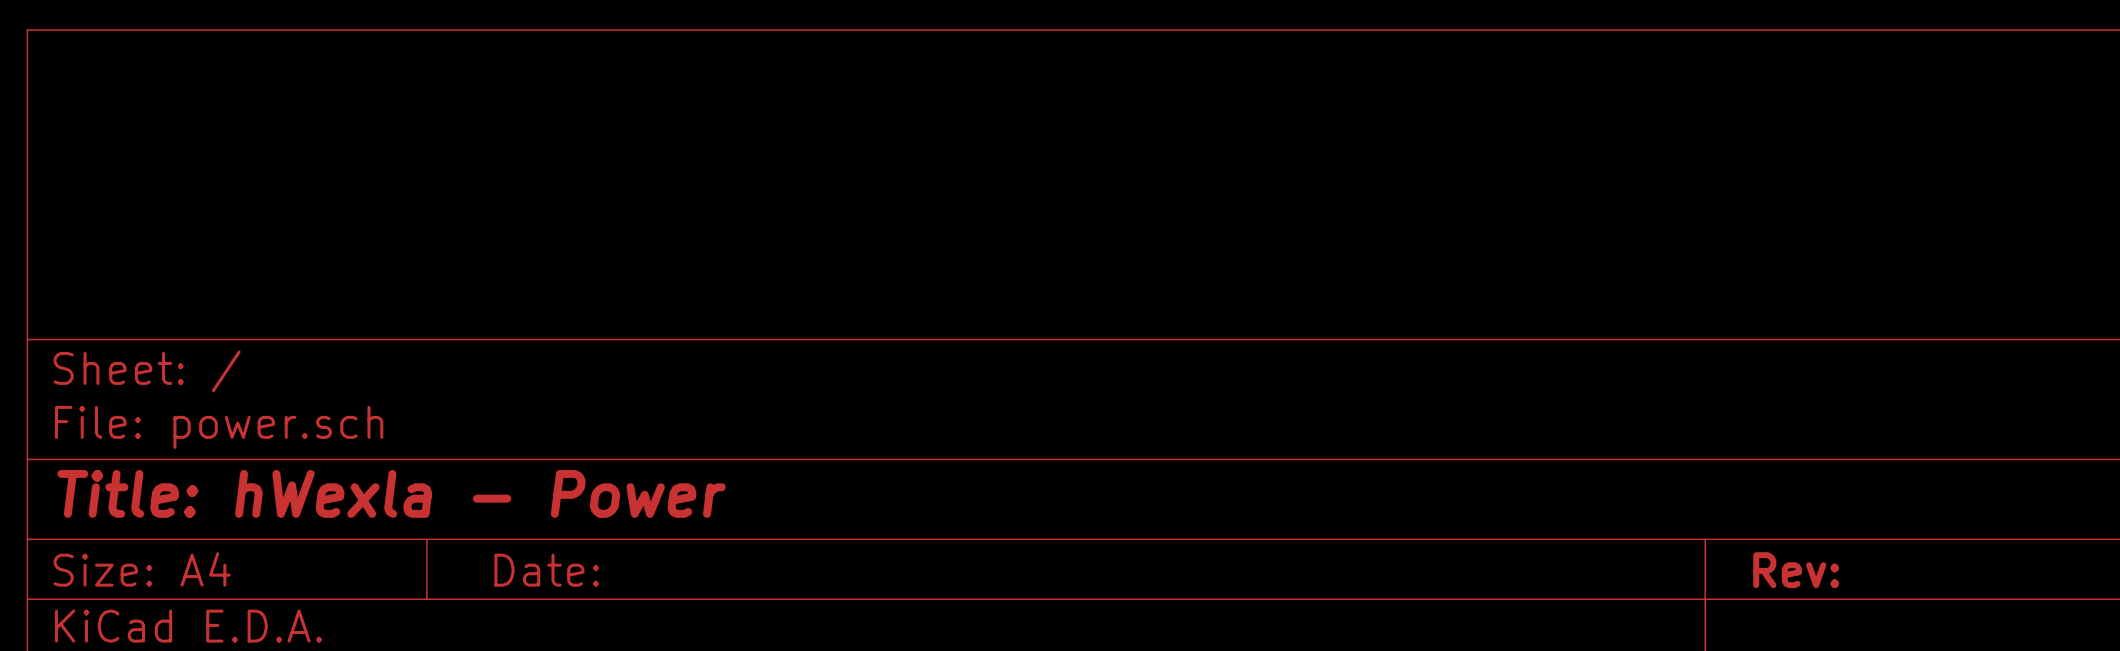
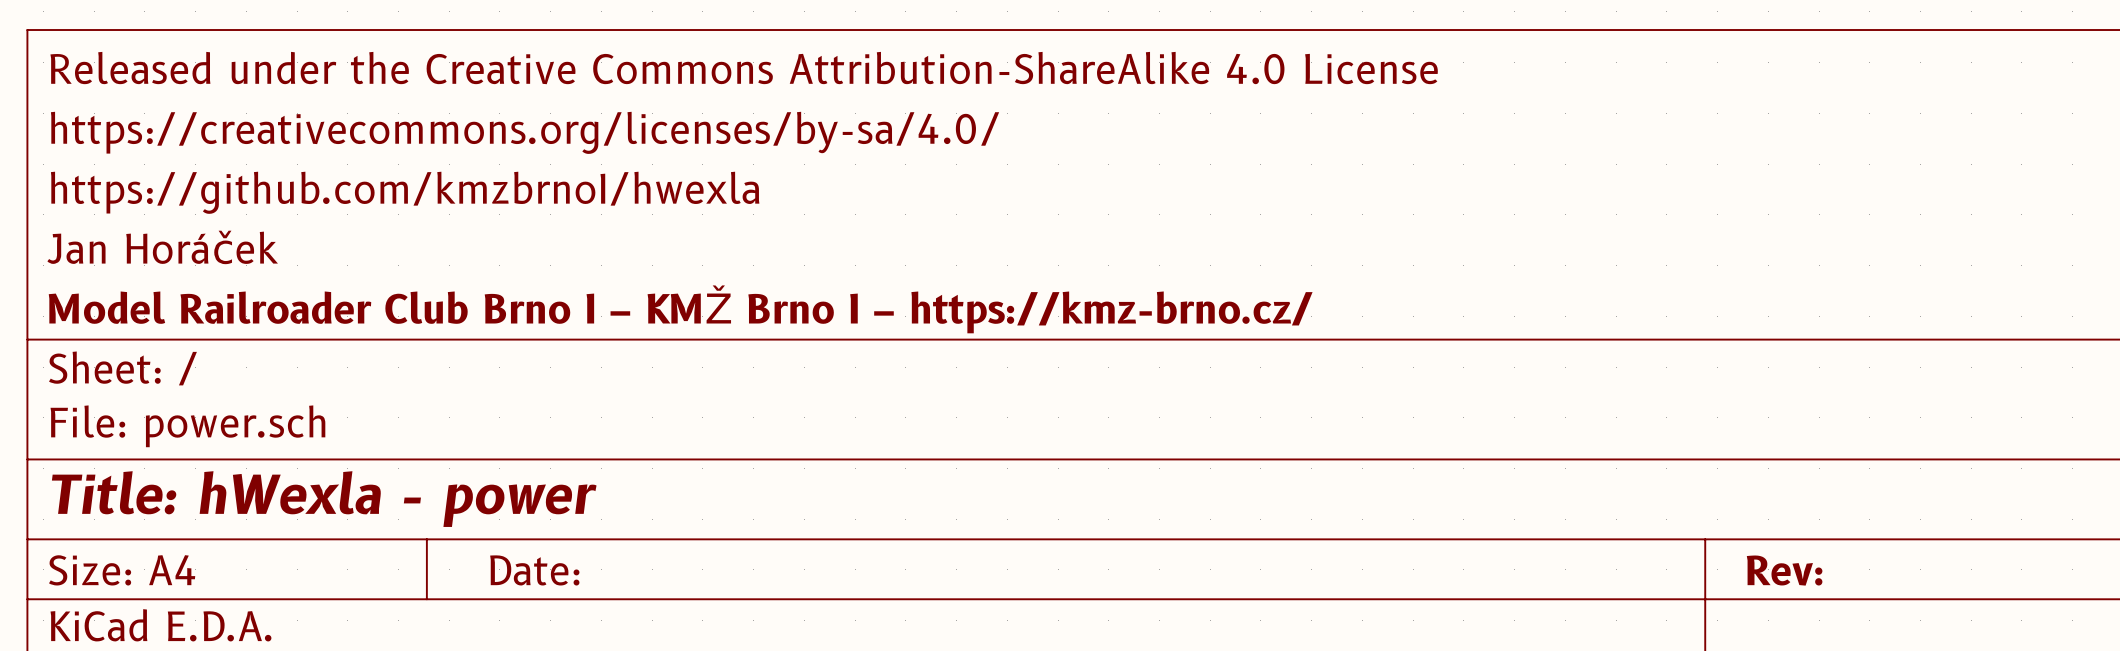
title block: none -> Released under the Creative Commons Attribution-ShareAlike 4.0 License (744, 68)
title block: none -> https://creativecommons.org/licenses/by-sa/4.0/ (525, 132)
title block: none -> https://github.com/kmzbrnoI/hwexla (405, 192)
title block: none -> Jan Horáček (162, 247)
title block: none -> Model Railroader Club Brno I – KMŽ Brno I – https://kmz-brno.cz/ (680, 309)
title block: Title: hWexla - Power (391, 493) -> Title: hWexla - power (324, 499)

